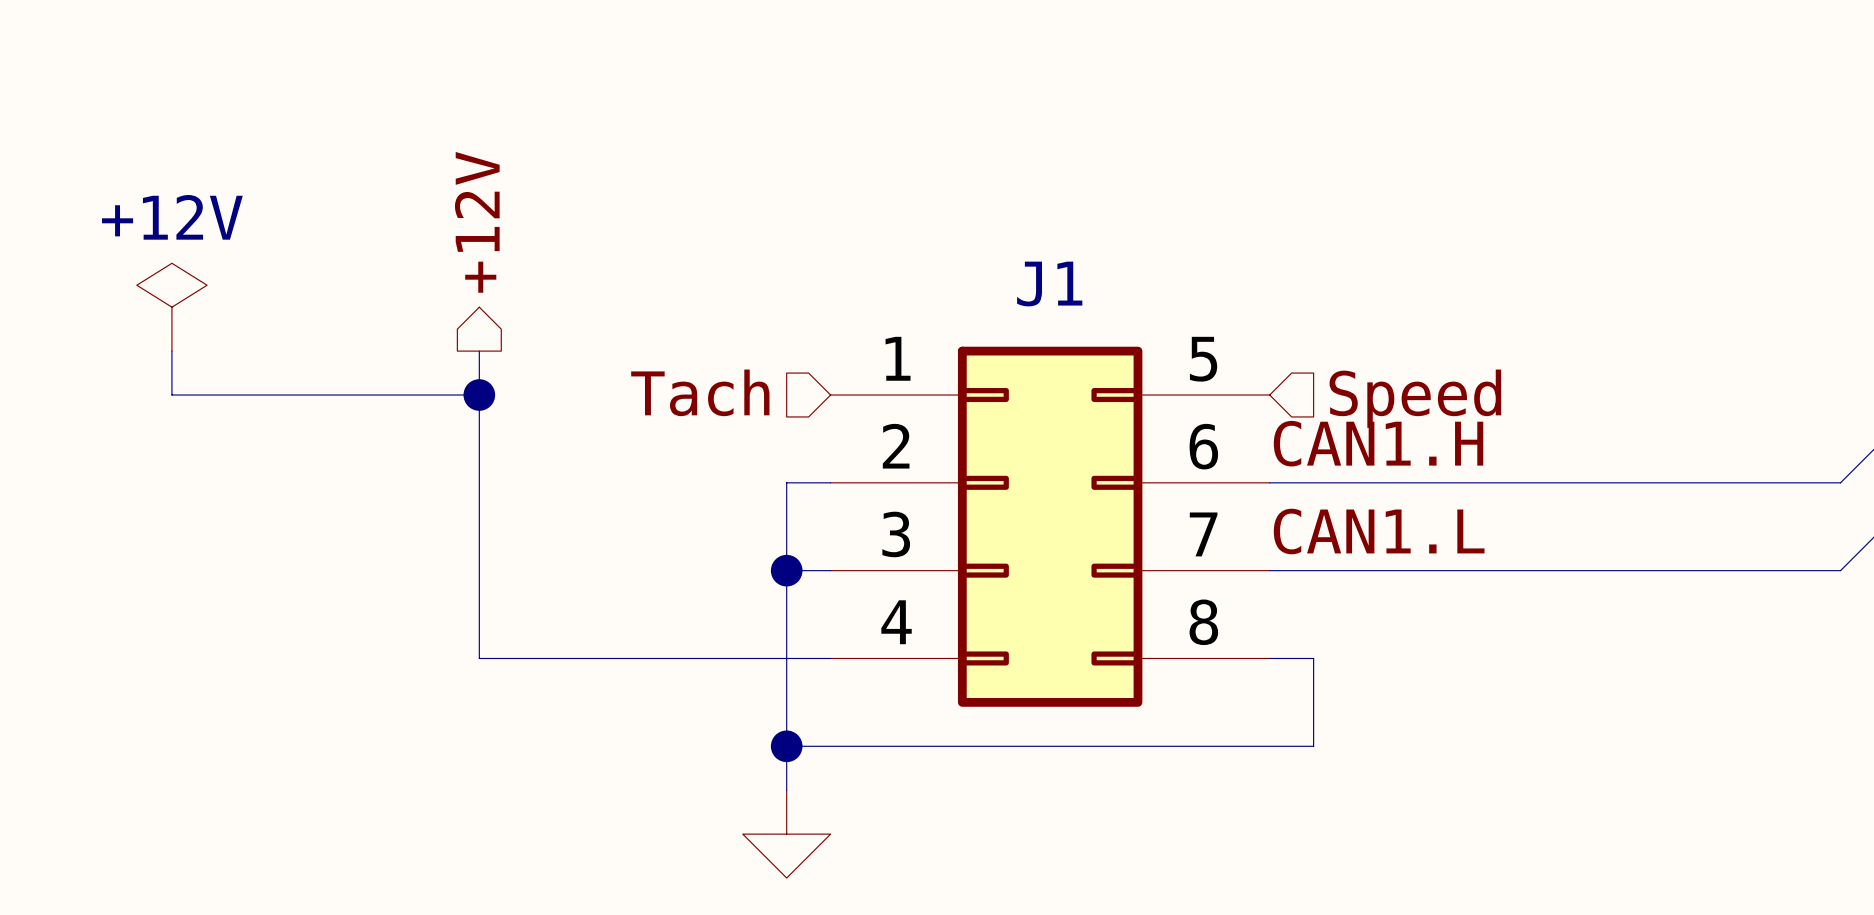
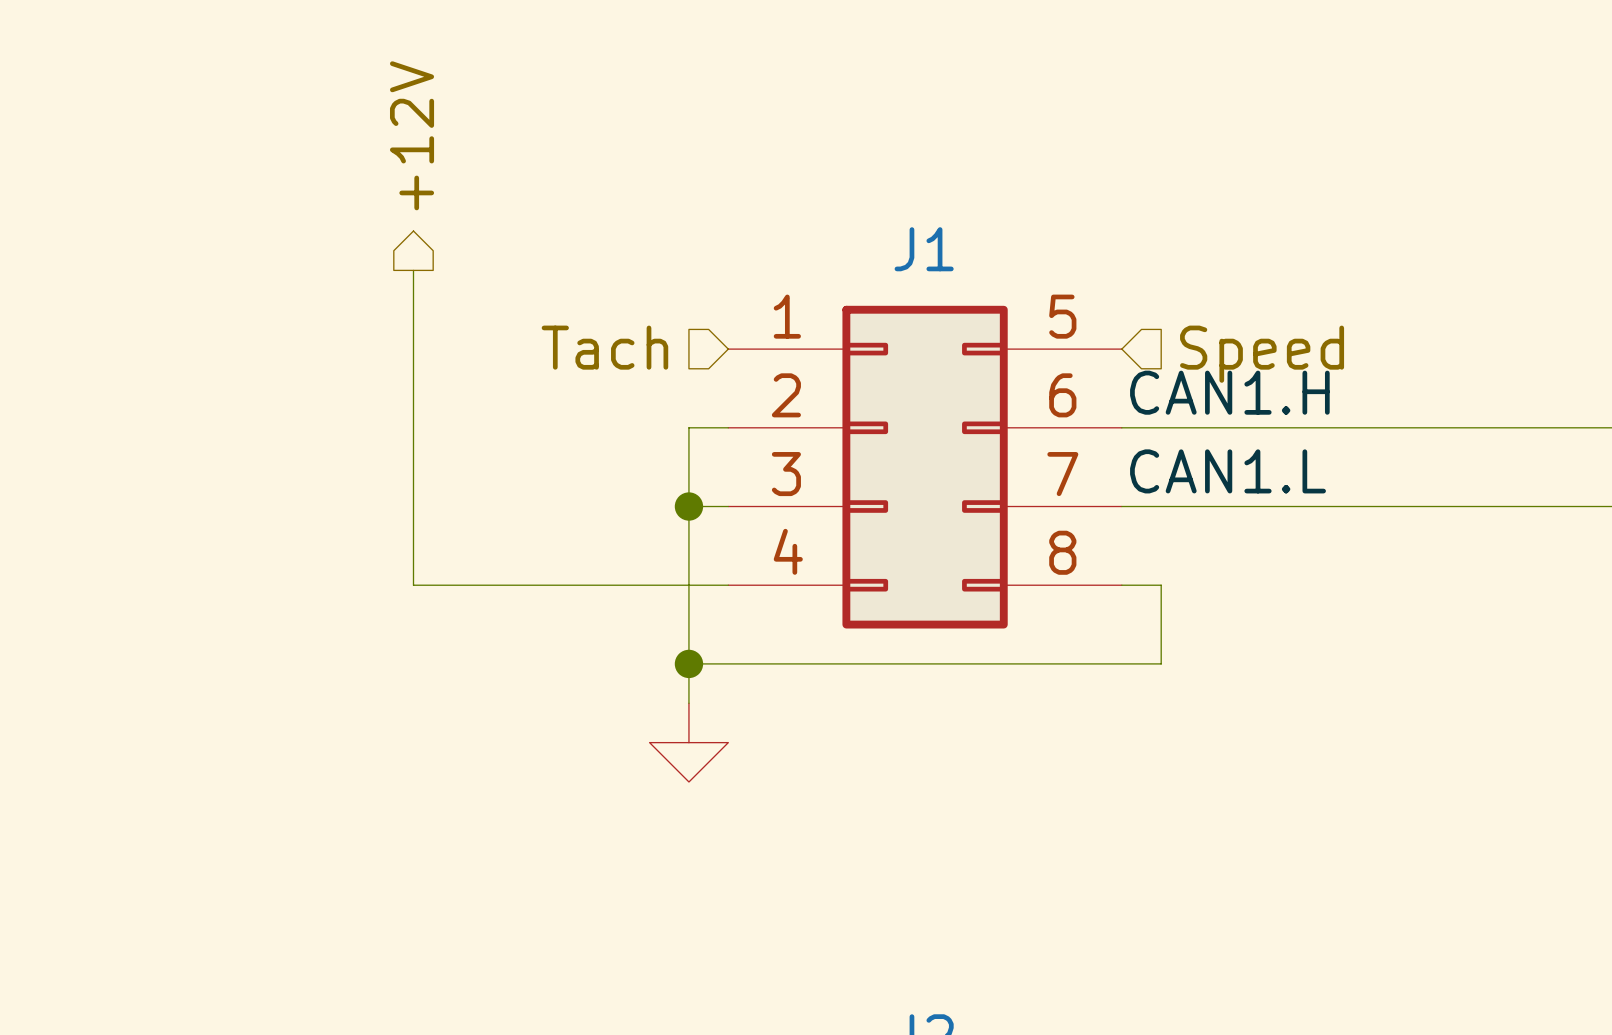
hierarchical label position: +12V (477, 222) -> +12V (412, 135)
power symbol: +12V (171, 307) -> none
wire: none -> (413, 270) (413, 309)
wire: (171, 351) (171, 395) (479, 395) -> none
junction: (479, 395) -> none

